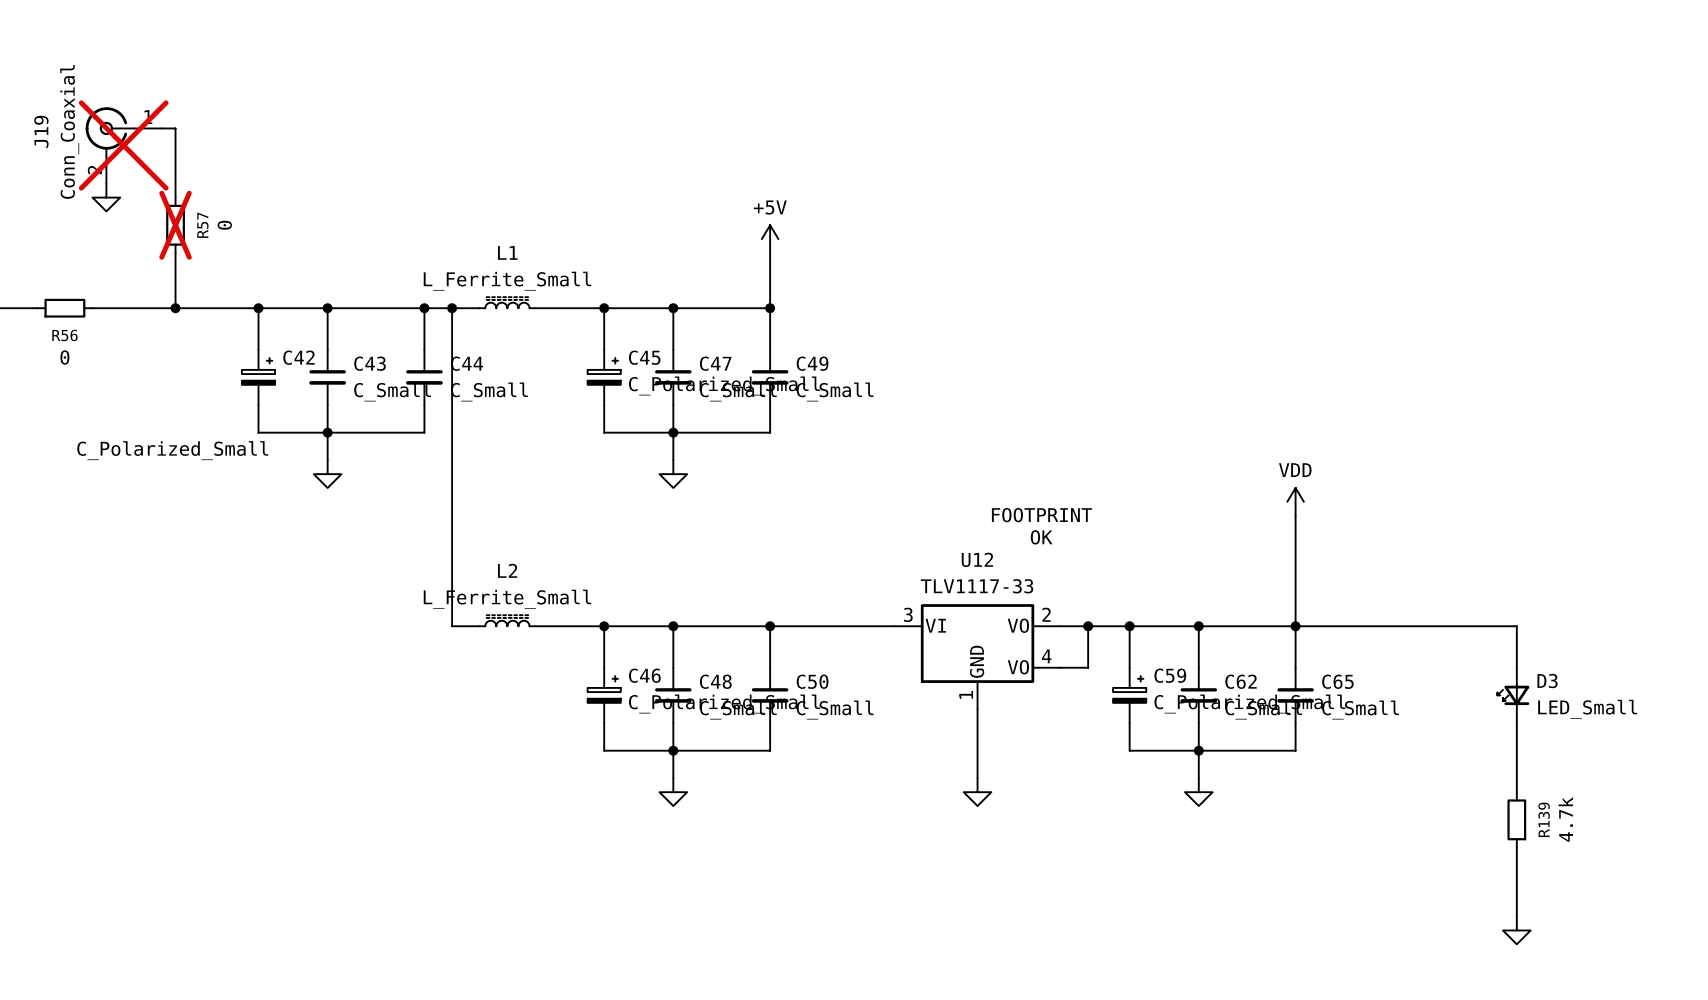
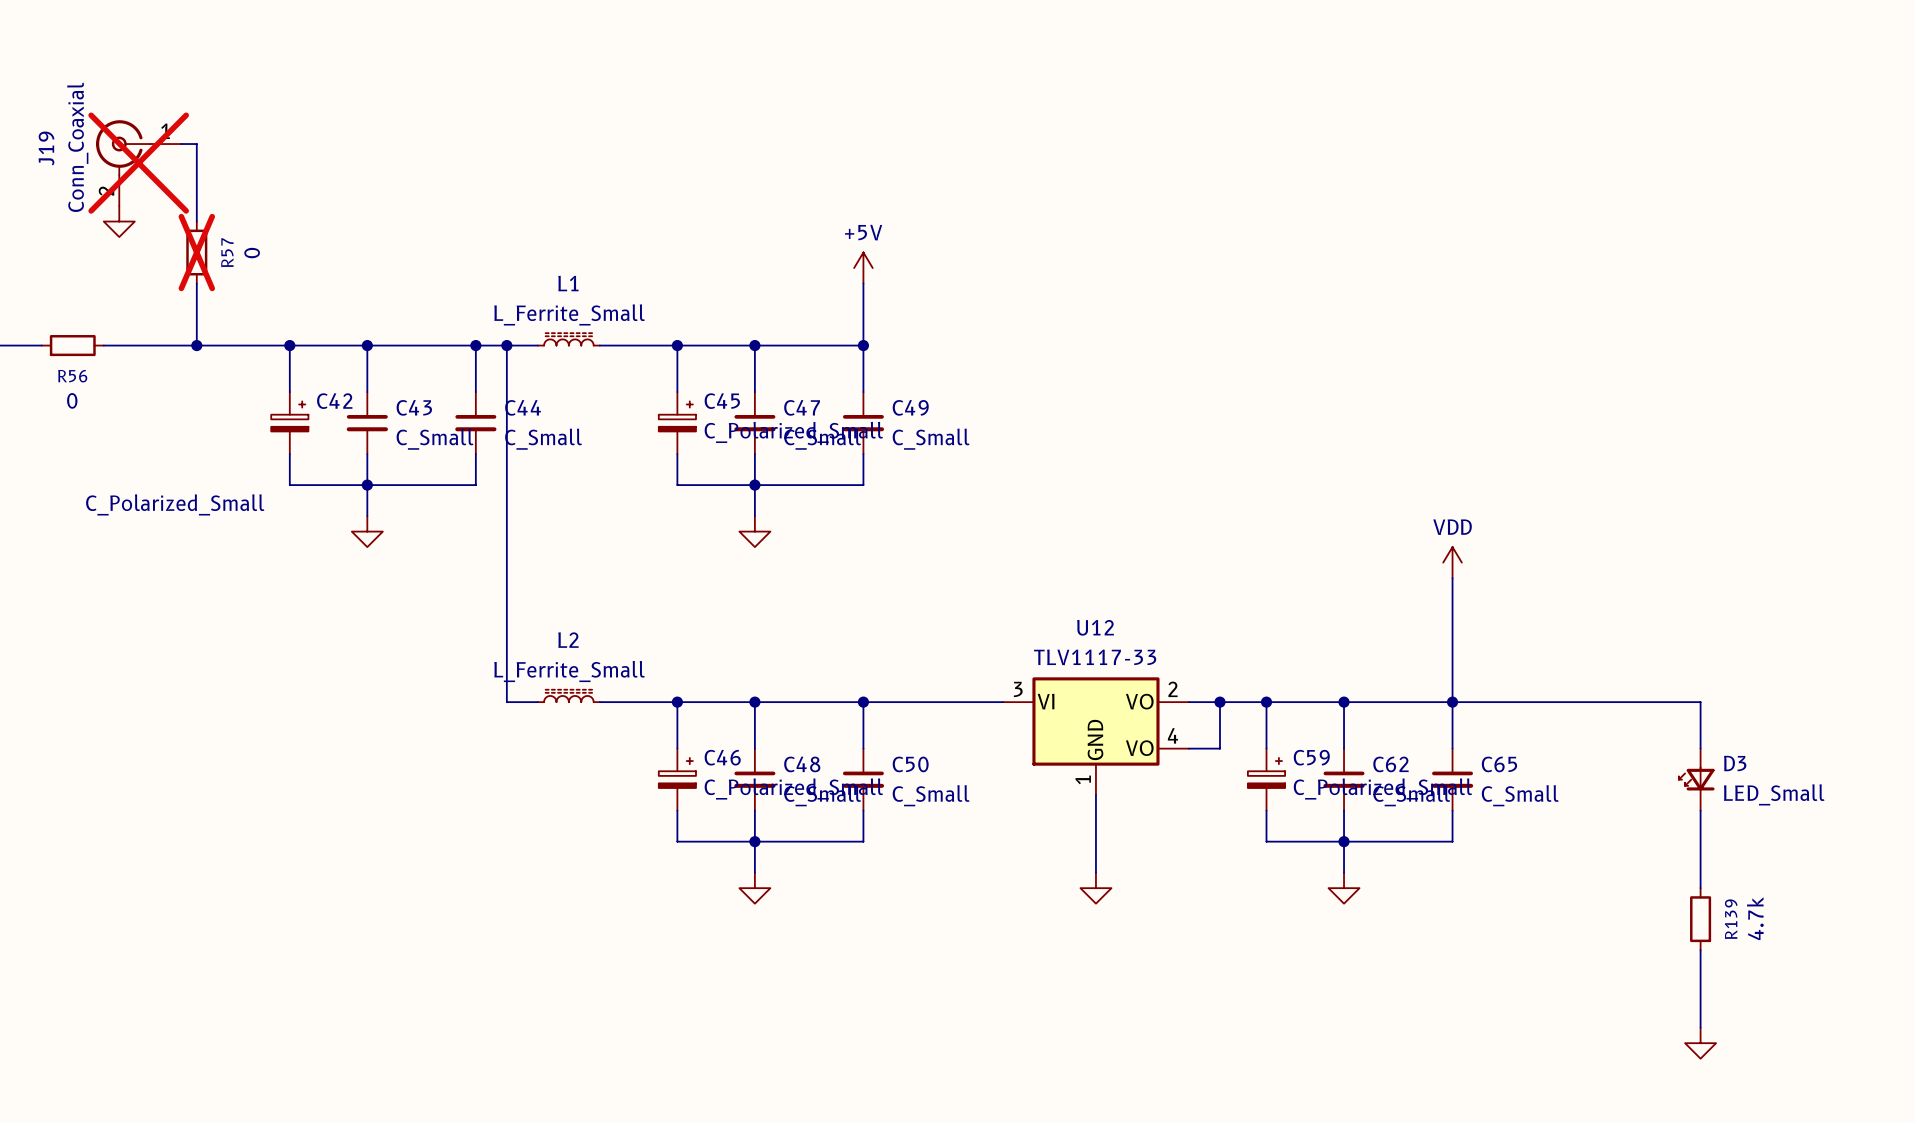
text: FOOTPRINT (1042, 515) -> none
text: OK (1041, 537) -> none

